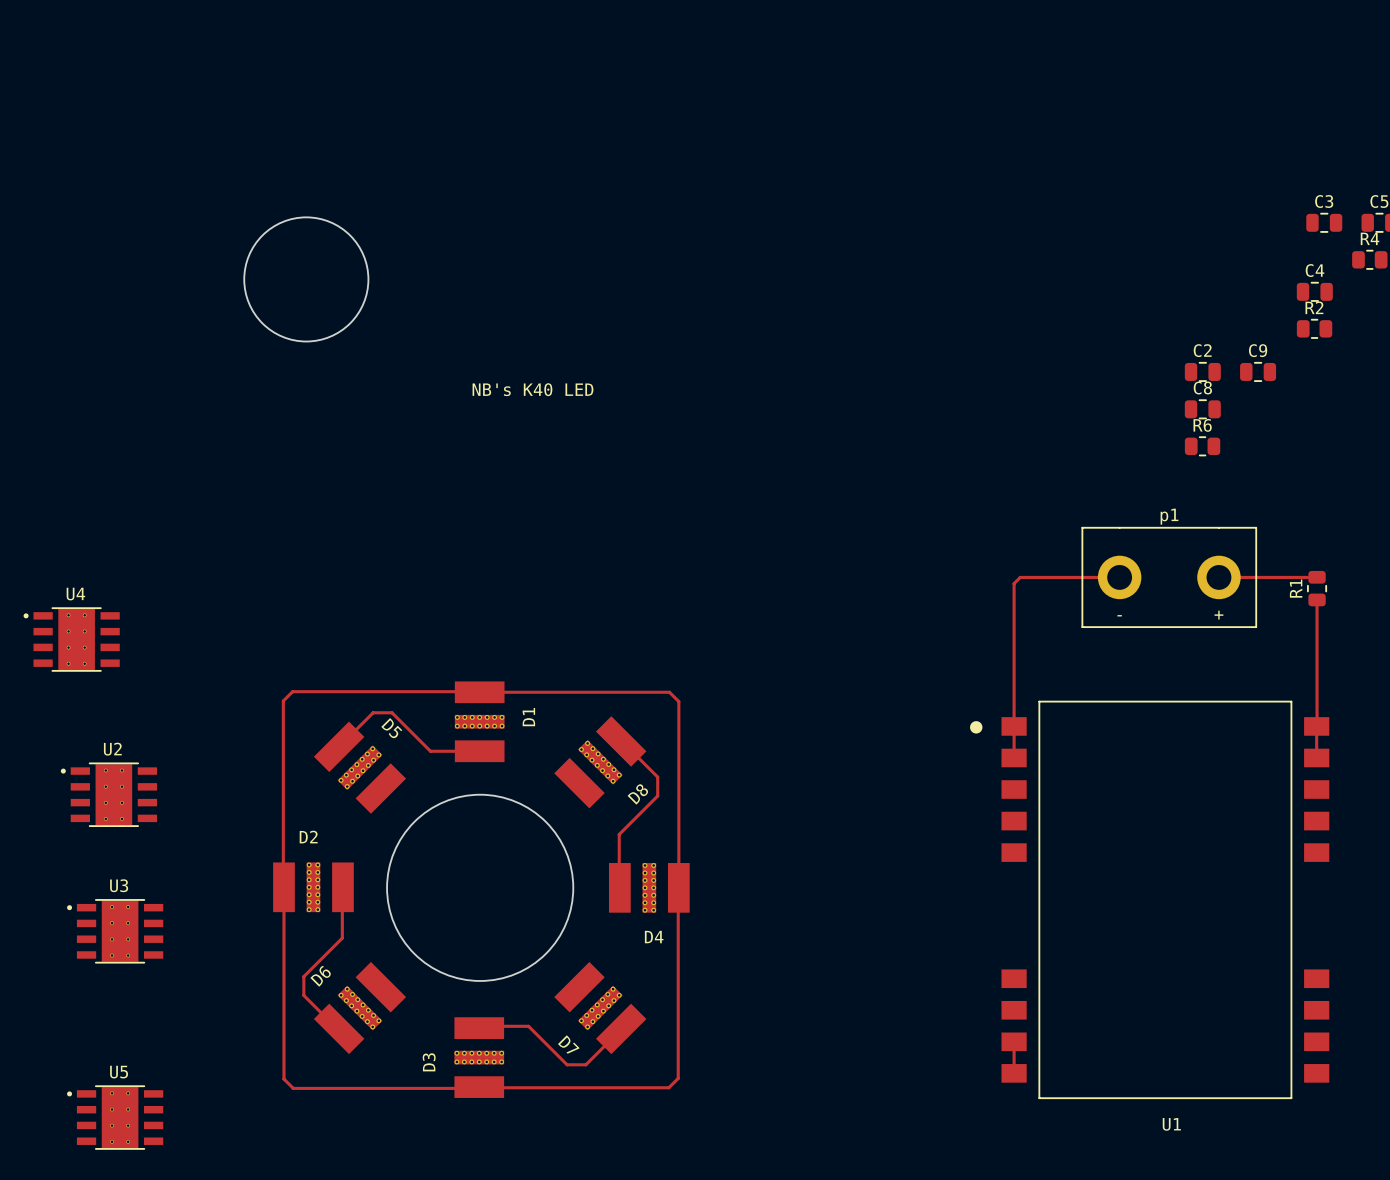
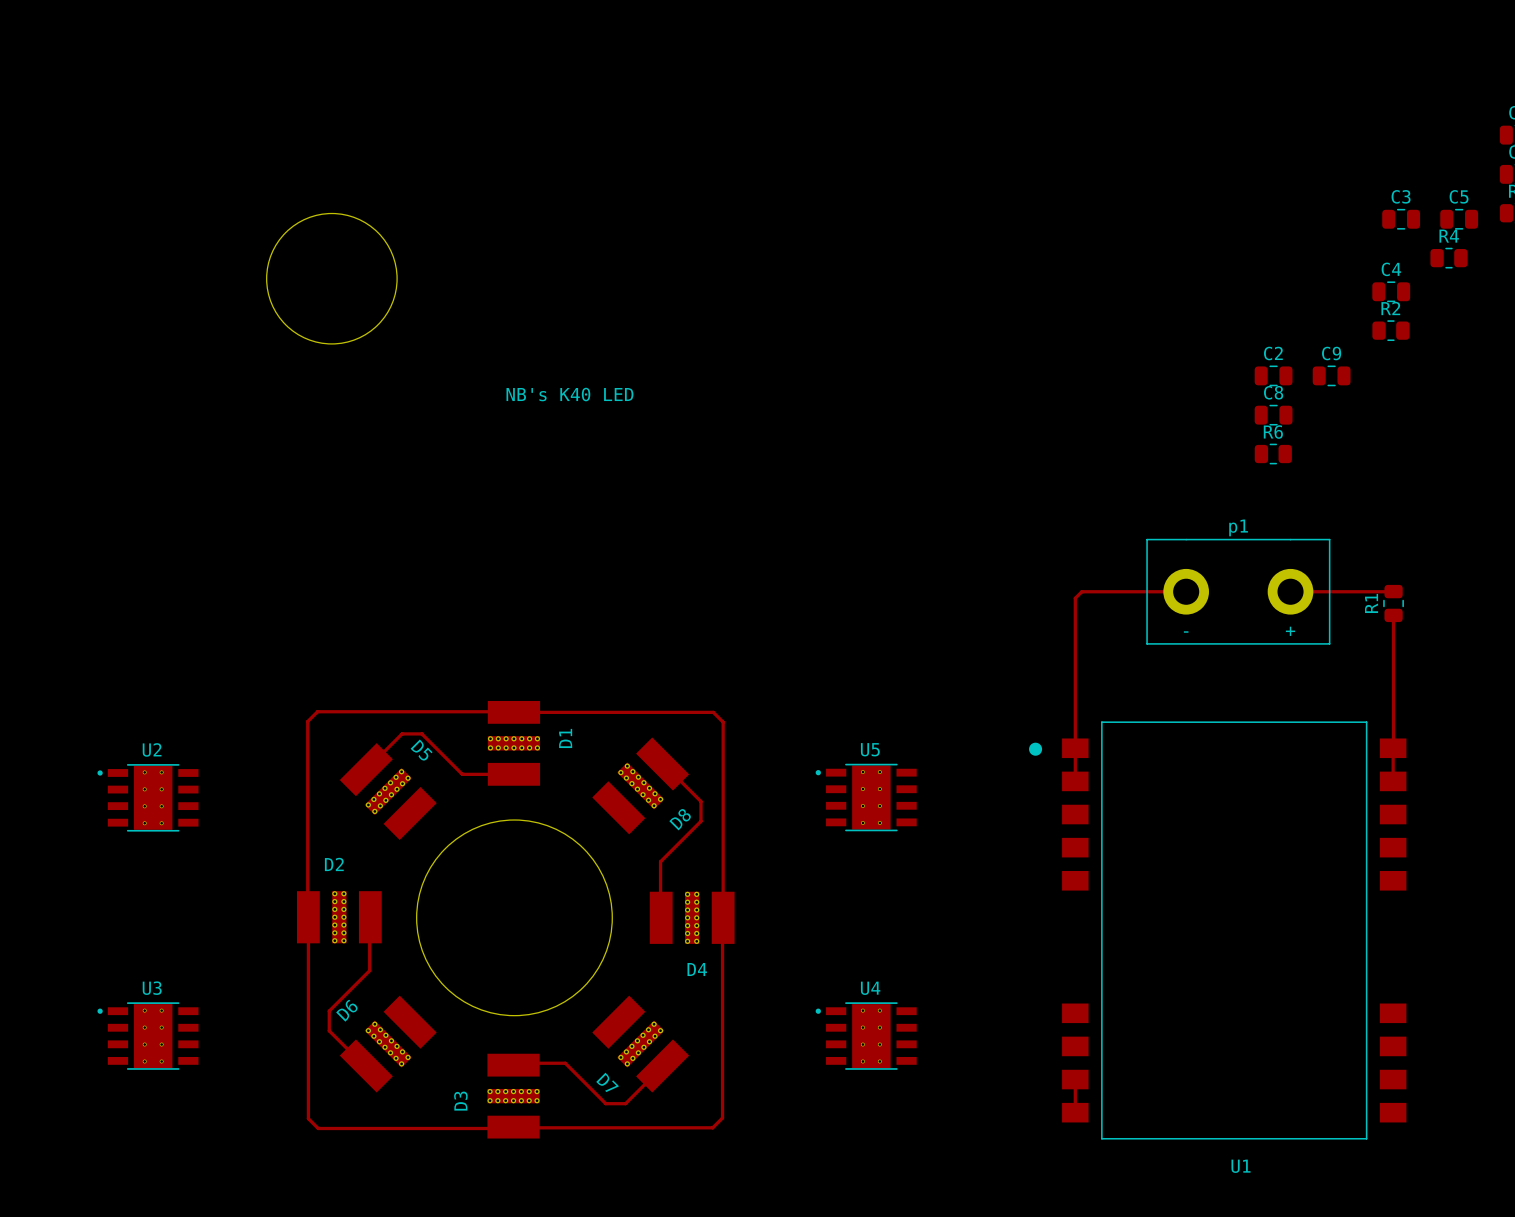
U4 position: (71, 639) -> (866, 1036)
U2 position: (108, 794) -> (148, 797)
U3 position: (115, 931) -> (148, 1036)
U5 position: (115, 1117) -> (866, 797)

